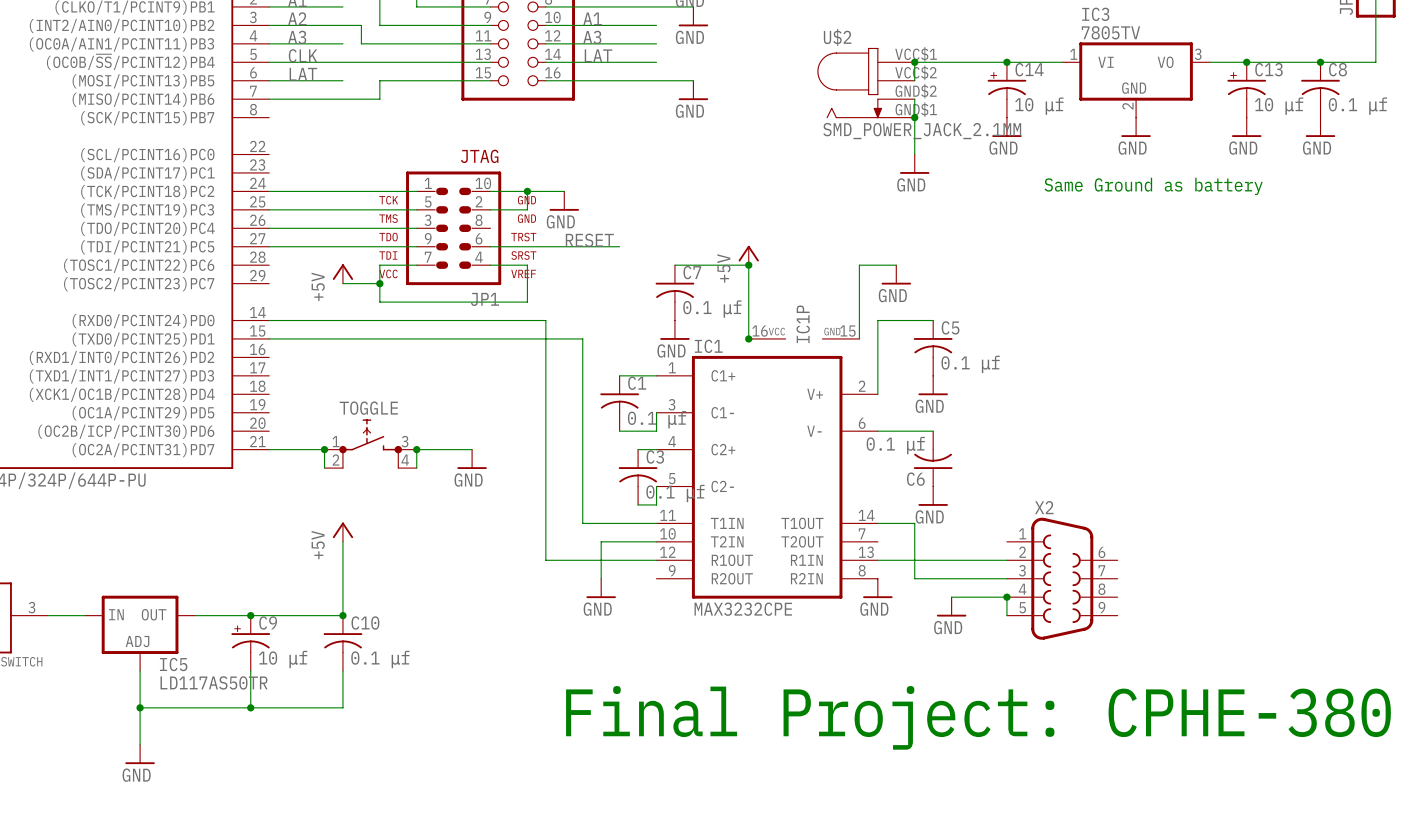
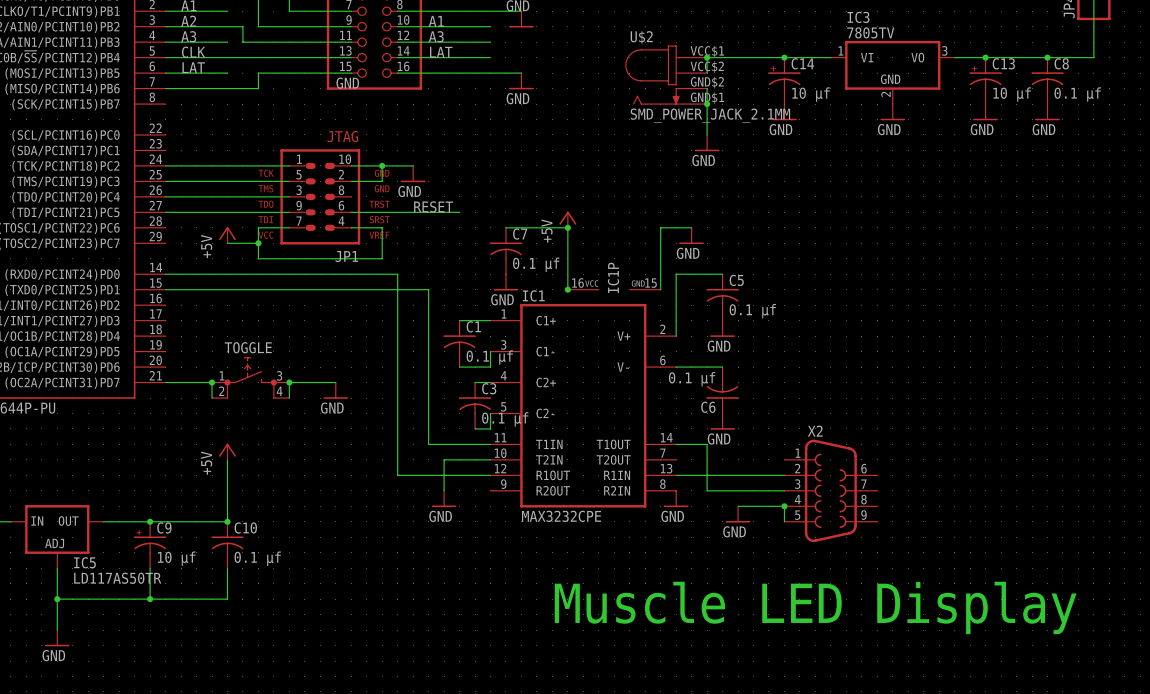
power symbol text position: GND (689, 37) -> GND (347, 83)
text: Same Ground as battery (1153, 186) -> none
text: Final Project: CPHE-380 (978, 717) -> none
text: none -> Muscle LED Display (815, 607)

